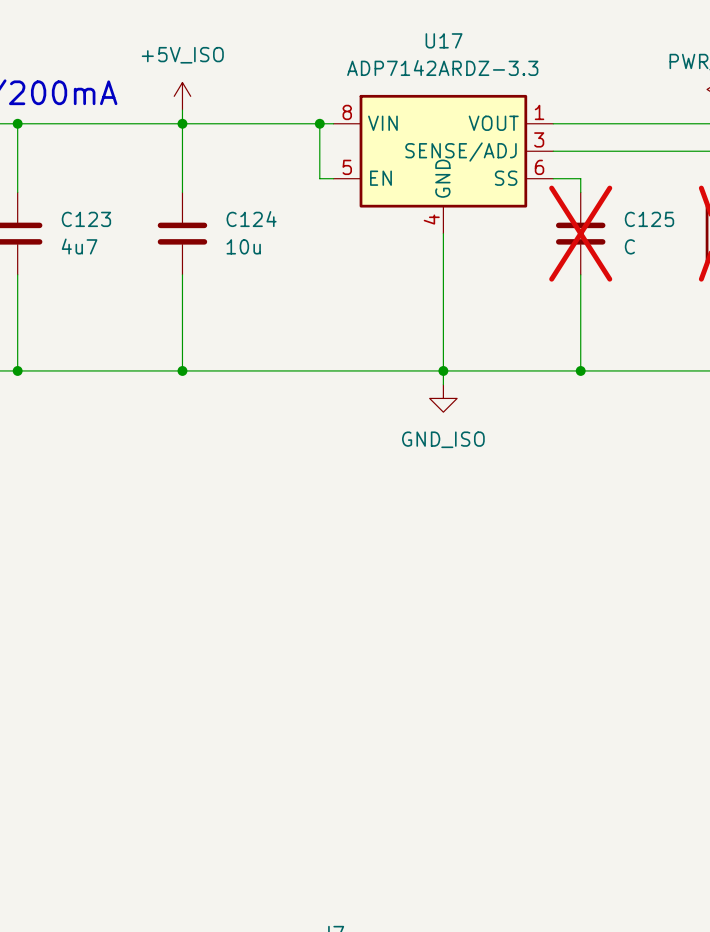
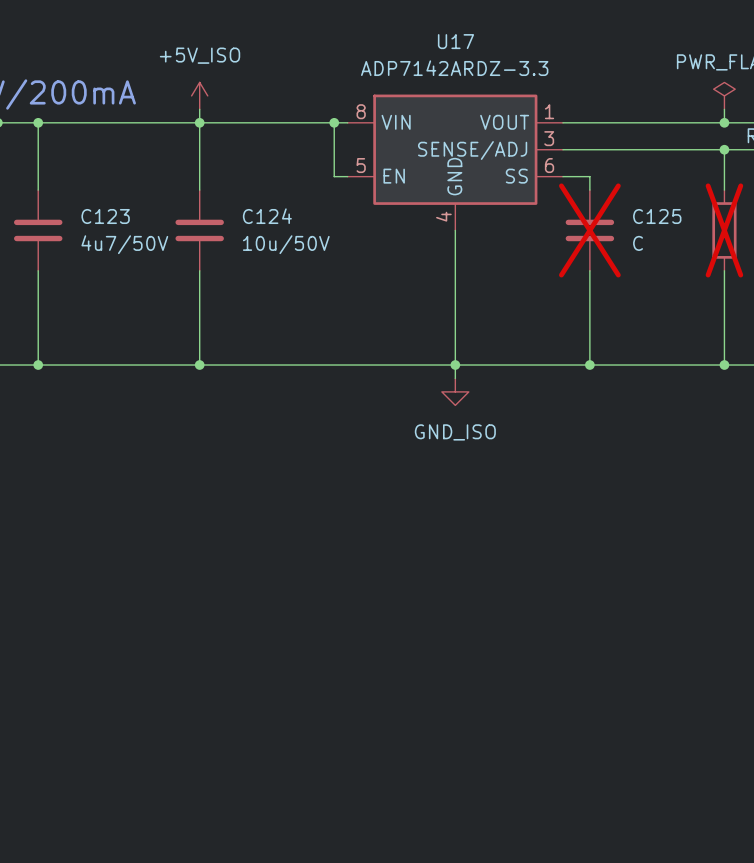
C123 value: 4u7 (79, 246) -> 4u7/50V (124, 244)
C124 value: 10u (243, 246) -> 10u/50V (286, 244)

